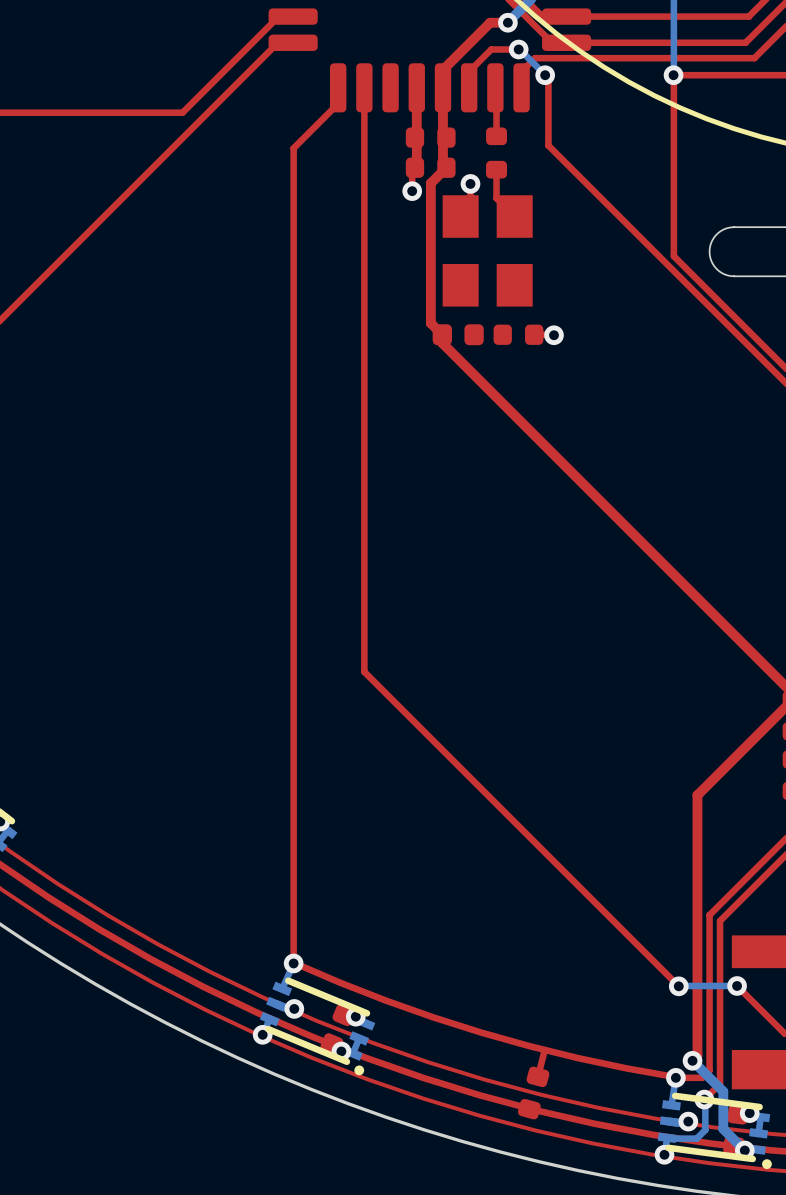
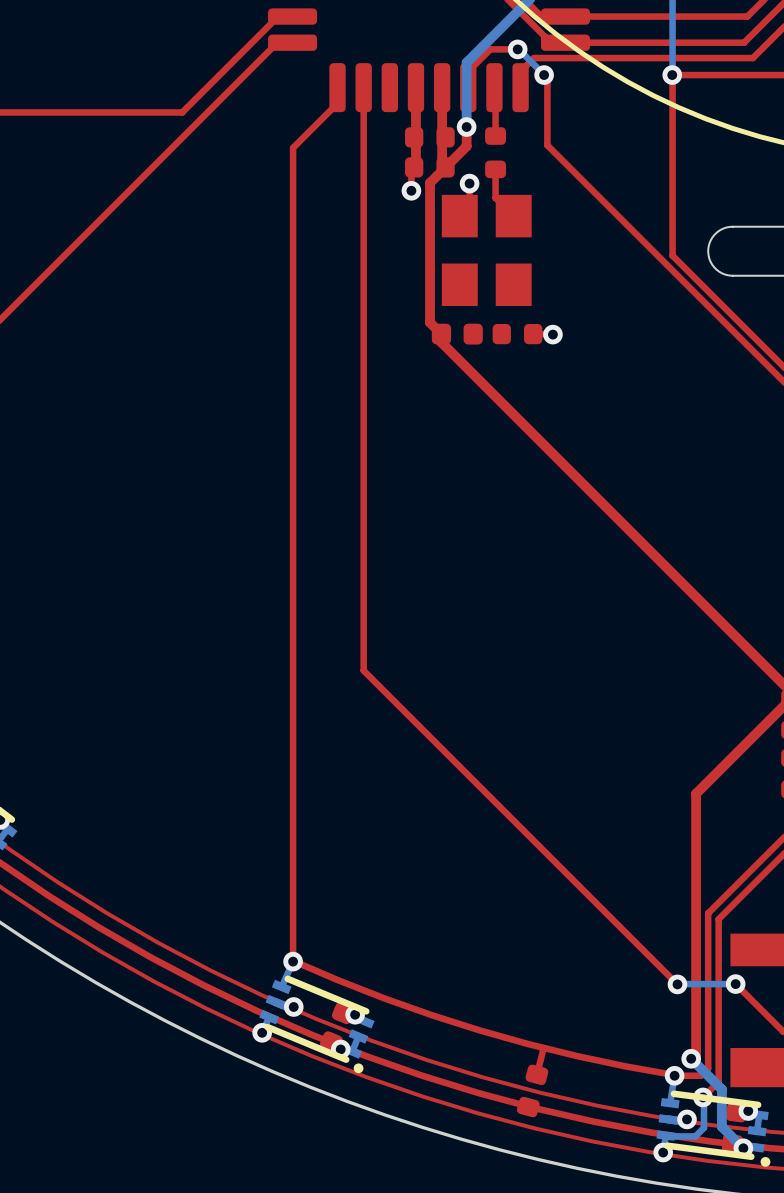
top track: (507, 22) (490, 22) (442, 69) (442, 87) -> none
bottom track: none -> (506, 22) (466, 62) (466, 127)
via position: (507, 22) -> (466, 127)
top track: none -> (466, 127) (466, 146) (445, 167)

